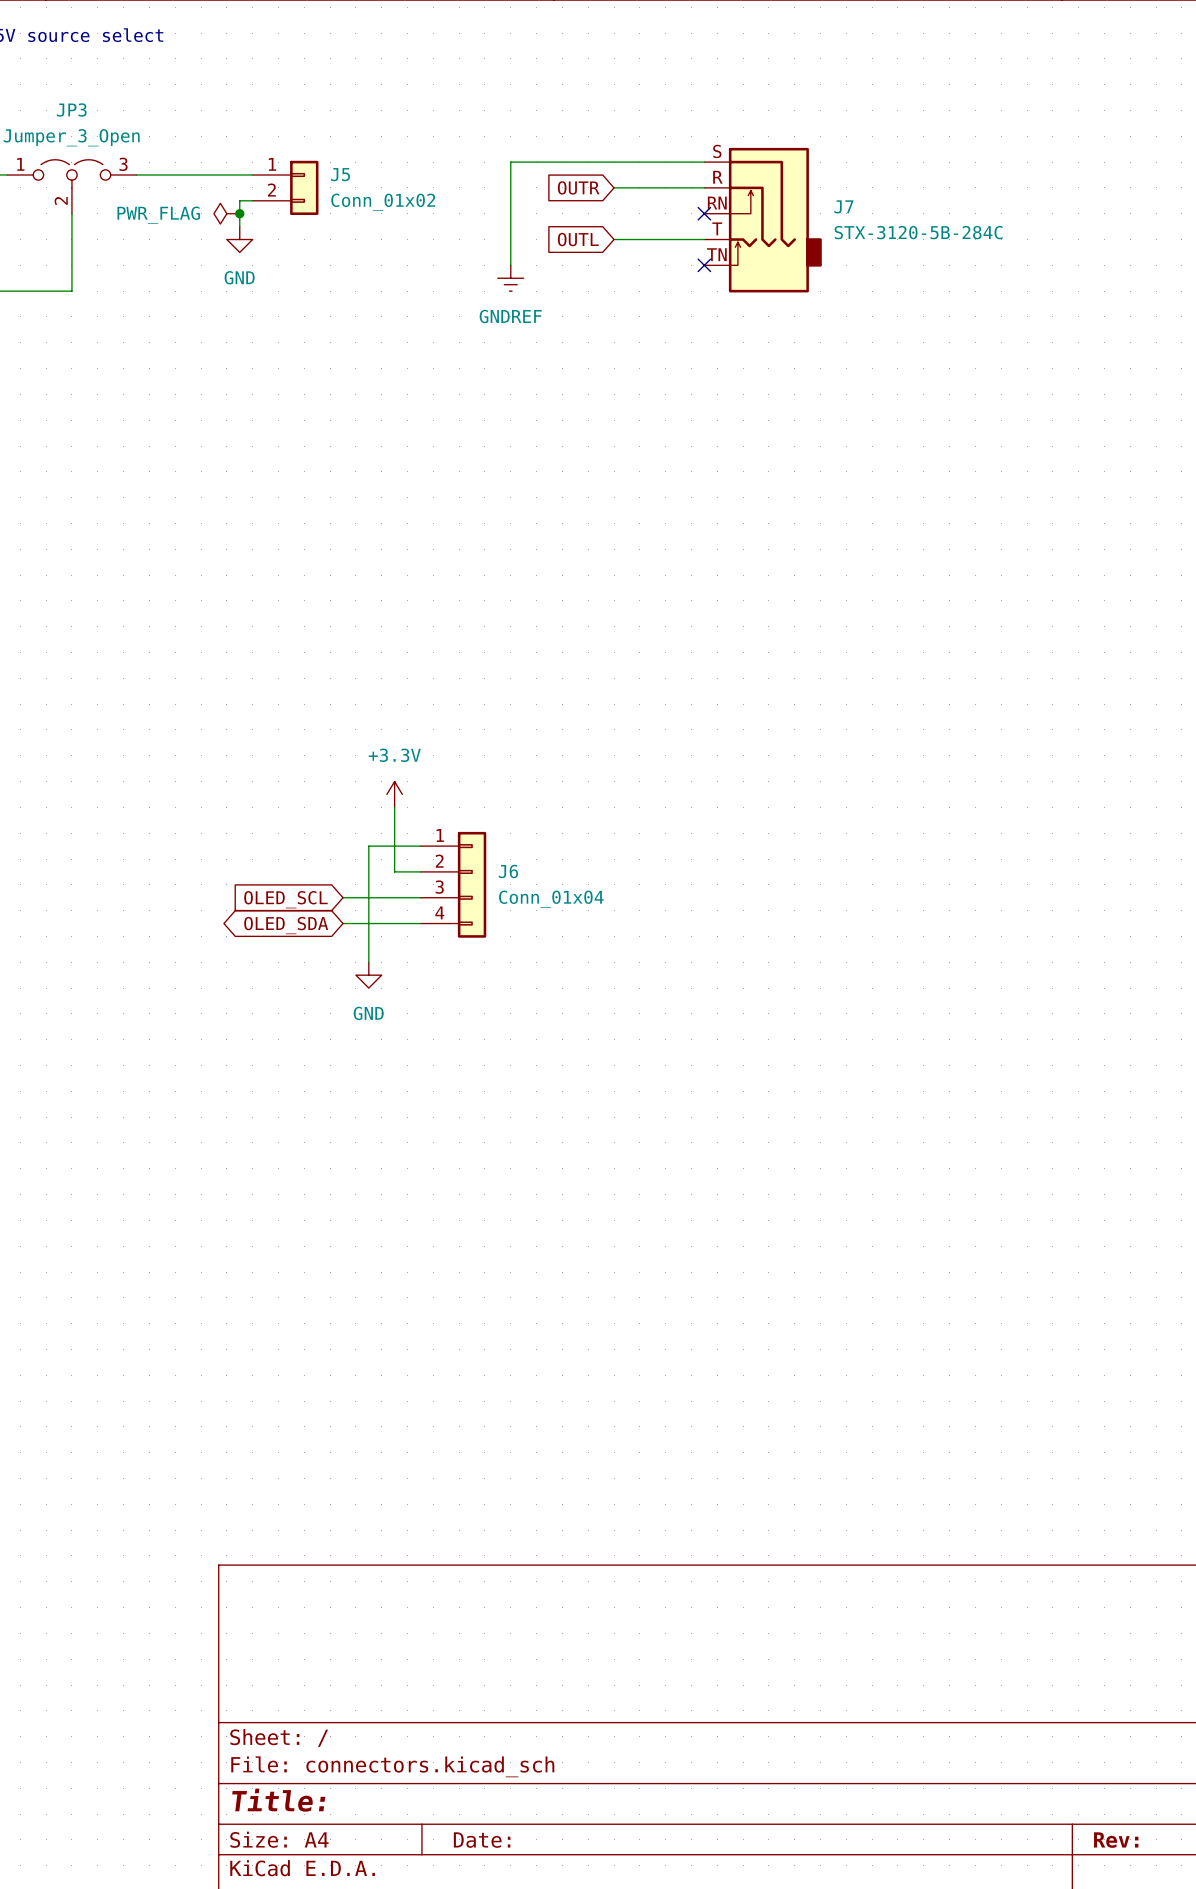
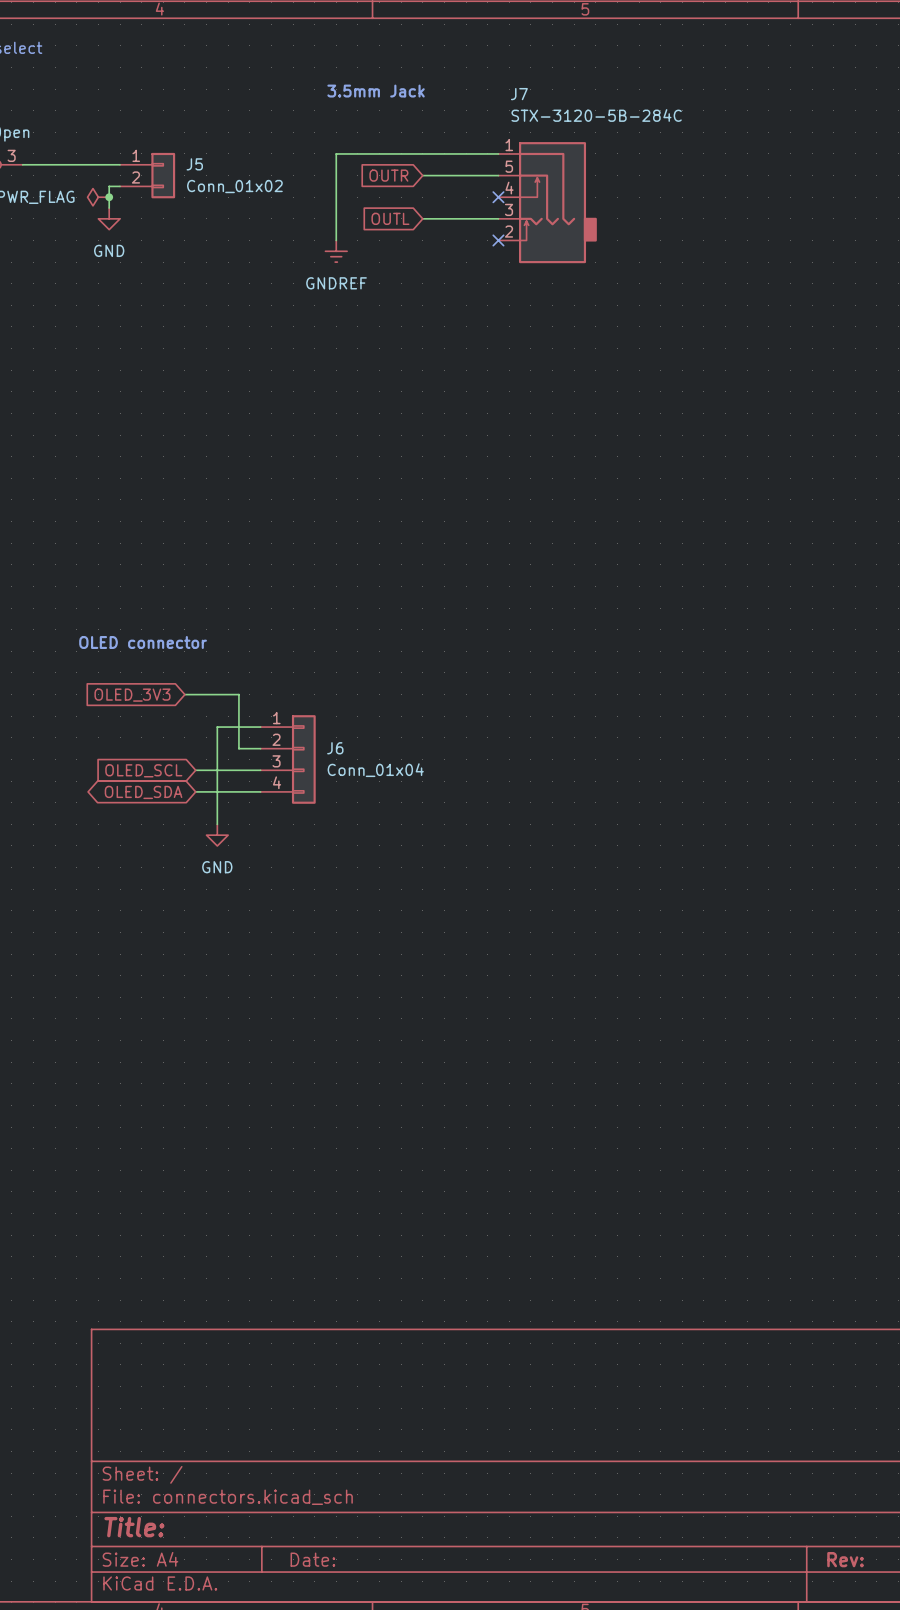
text: none -> 3.5mm Jack (376, 91)
J7 pin number: S (717, 151) -> 1 (509, 145)
J7 pin number: R (717, 177) -> 5 (509, 166)
J7 pin number: RN (717, 203) -> 4 (509, 188)
J7 name position: J7 (843, 206) -> J7 (519, 94)
J7 pin number: T (717, 228) -> 3 (509, 209)
J7 value position: STX-3120-5B-284C (918, 232) -> STX-3120-5B-284C (596, 115)
J7 pin number: TN (716, 254) -> 2 (509, 231)
text: none -> OLED connector (143, 642)
power symbol: +3.3V (394, 794) -> none
wire: none -> (184, 694) (238, 694)
global label: none -> OLED_3V3 (132, 695)

